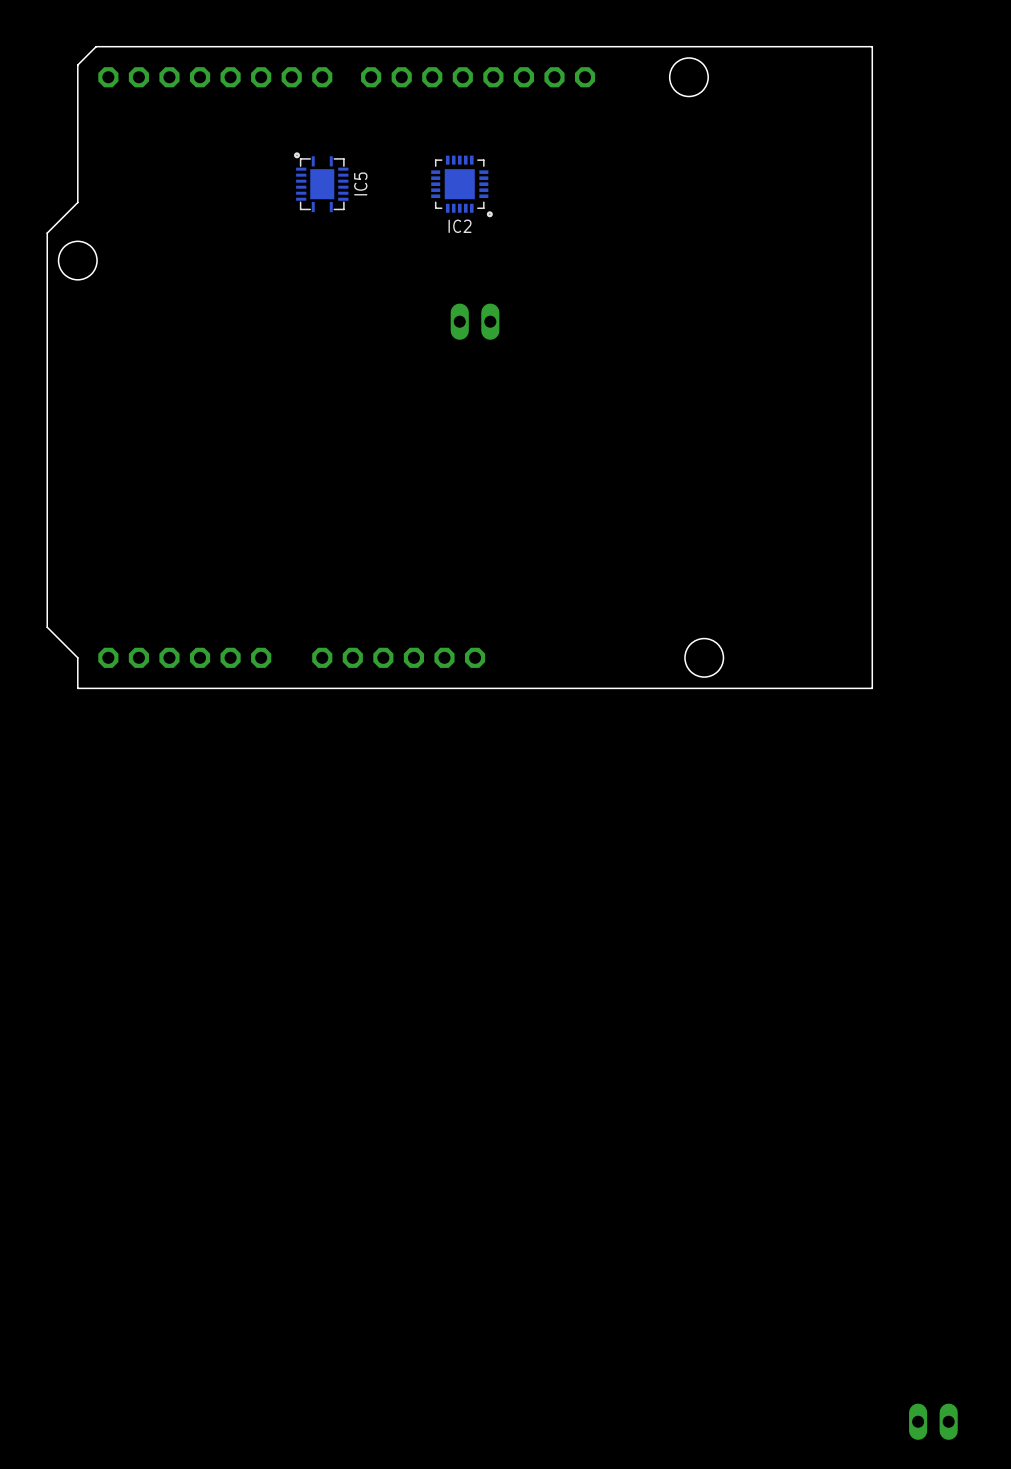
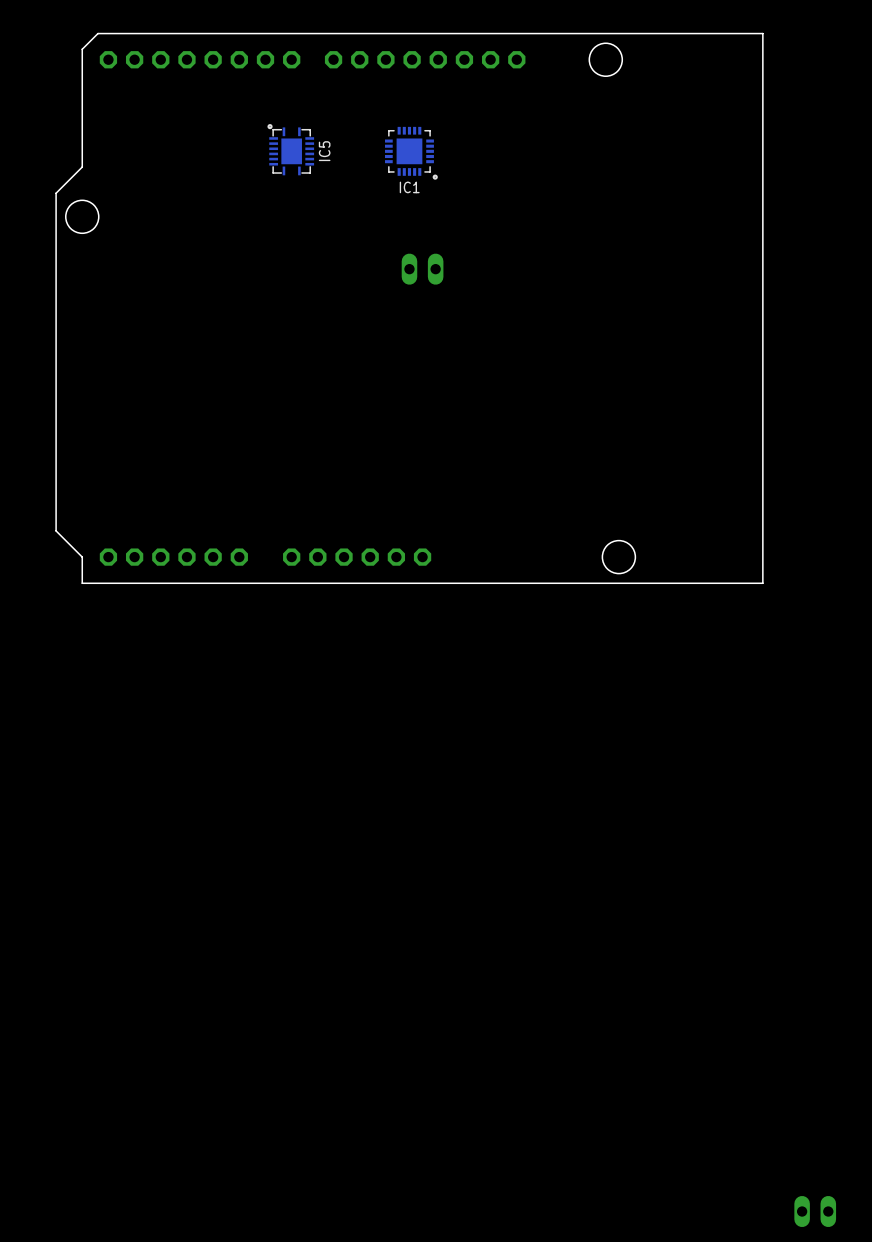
IC2 name: IC2 (460, 226) -> IC1 (409, 187)

